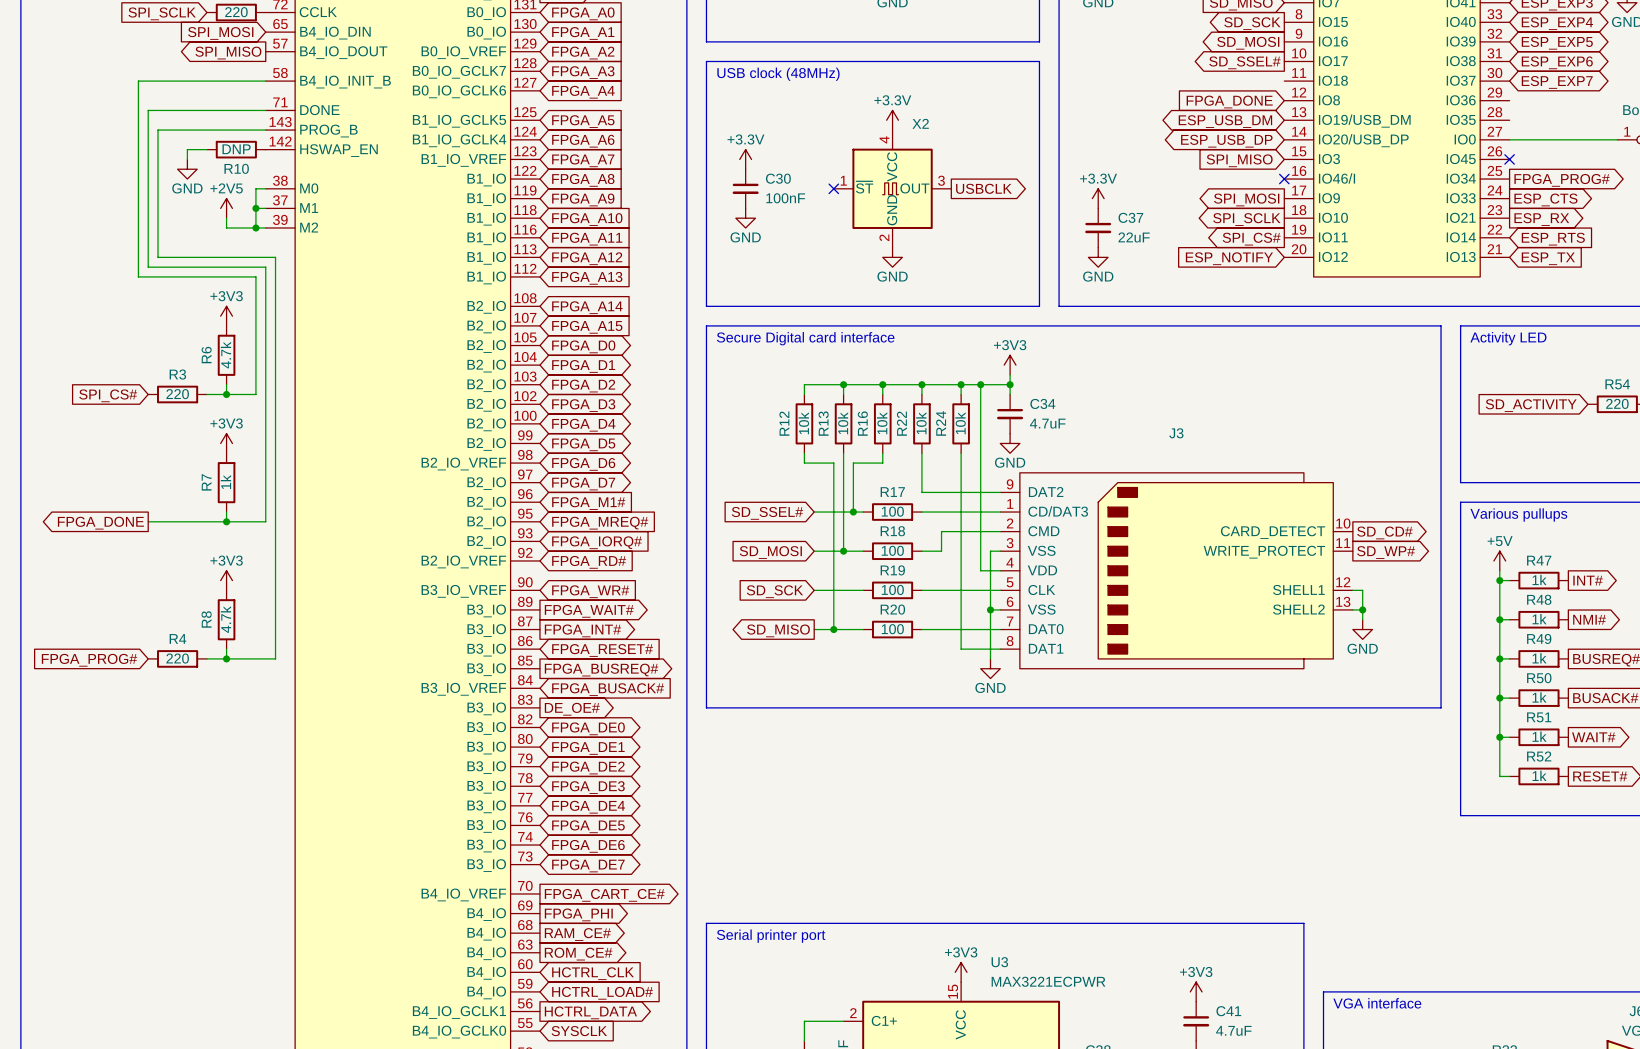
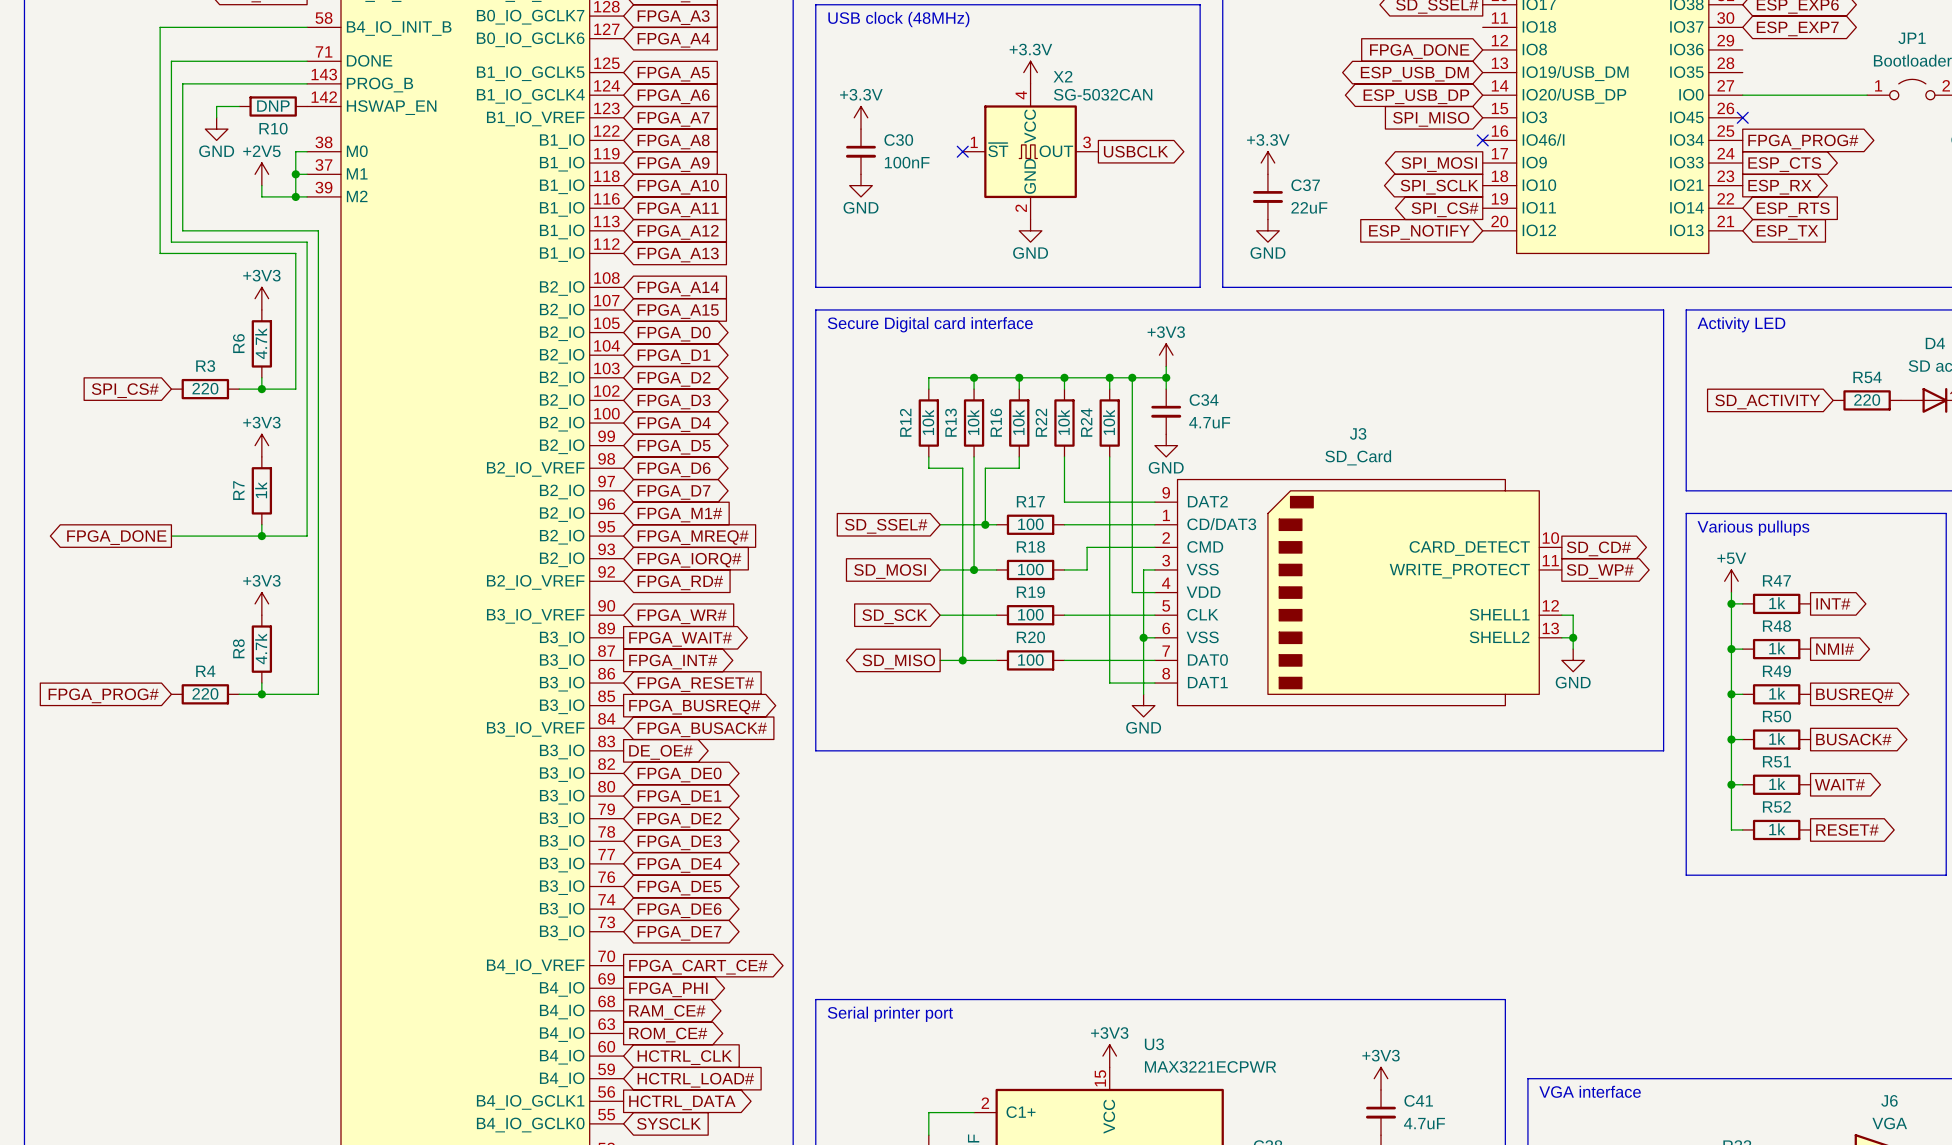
X2 value: none -> SG-5032CAN (1103, 94)
J3 value: none -> SD_Card (1358, 457)

